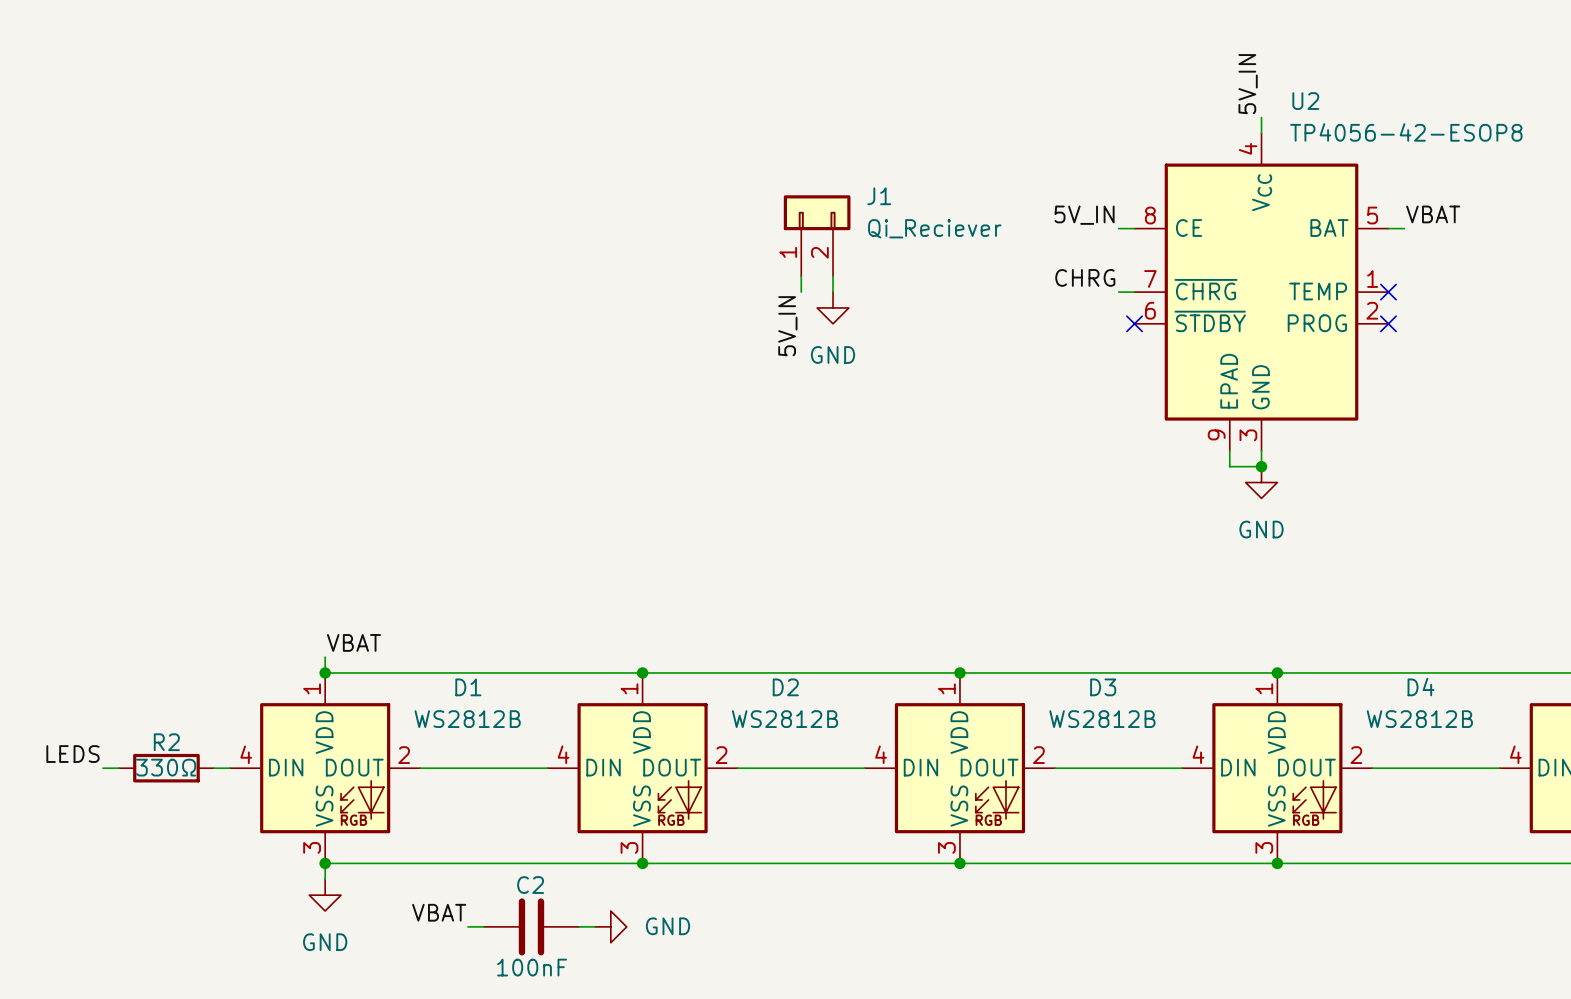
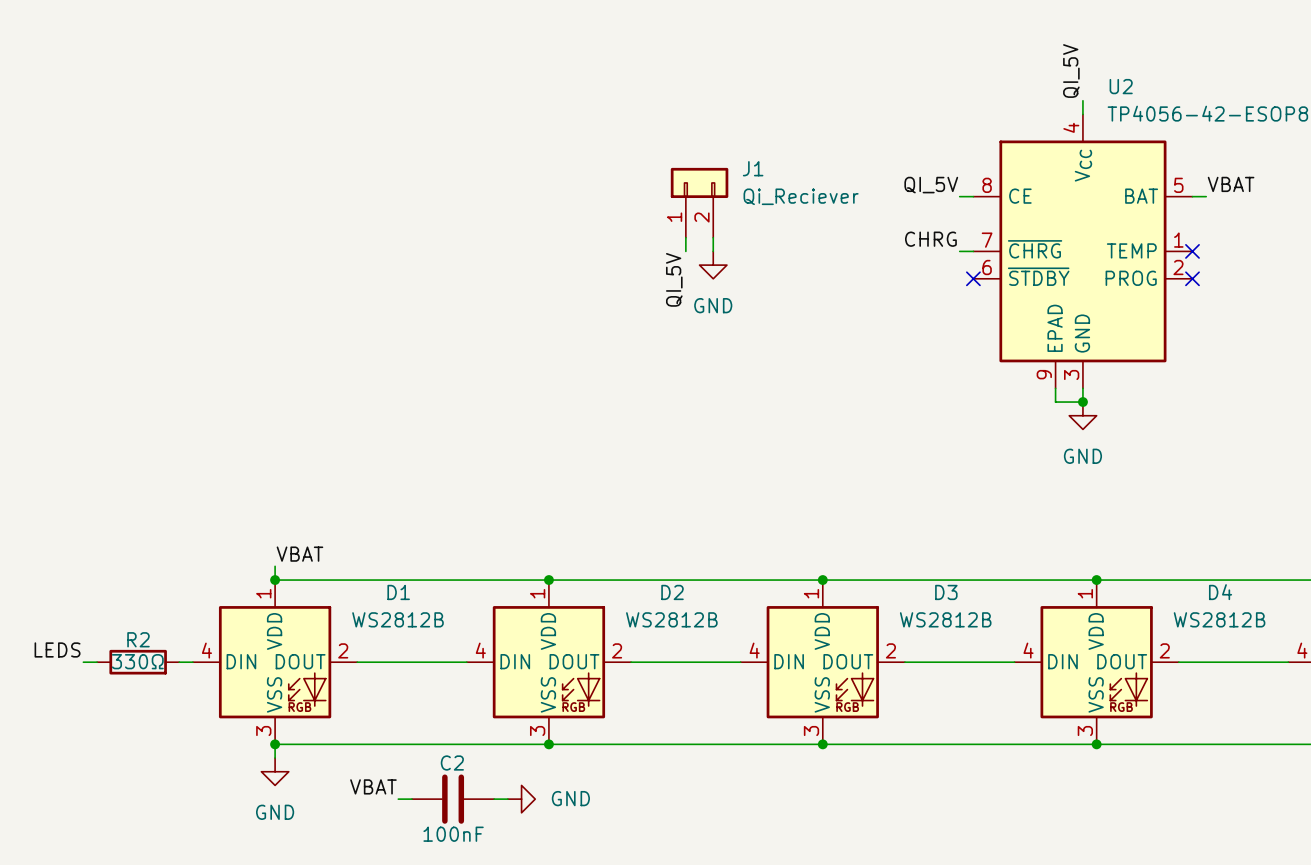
label: 5V_IN (1248, 84) -> QI_5V (1071, 71)
label: 5V_IN (1084, 215) -> QI_5V (931, 185)
label: 5V_IN (787, 326) -> QI_5V (674, 279)

